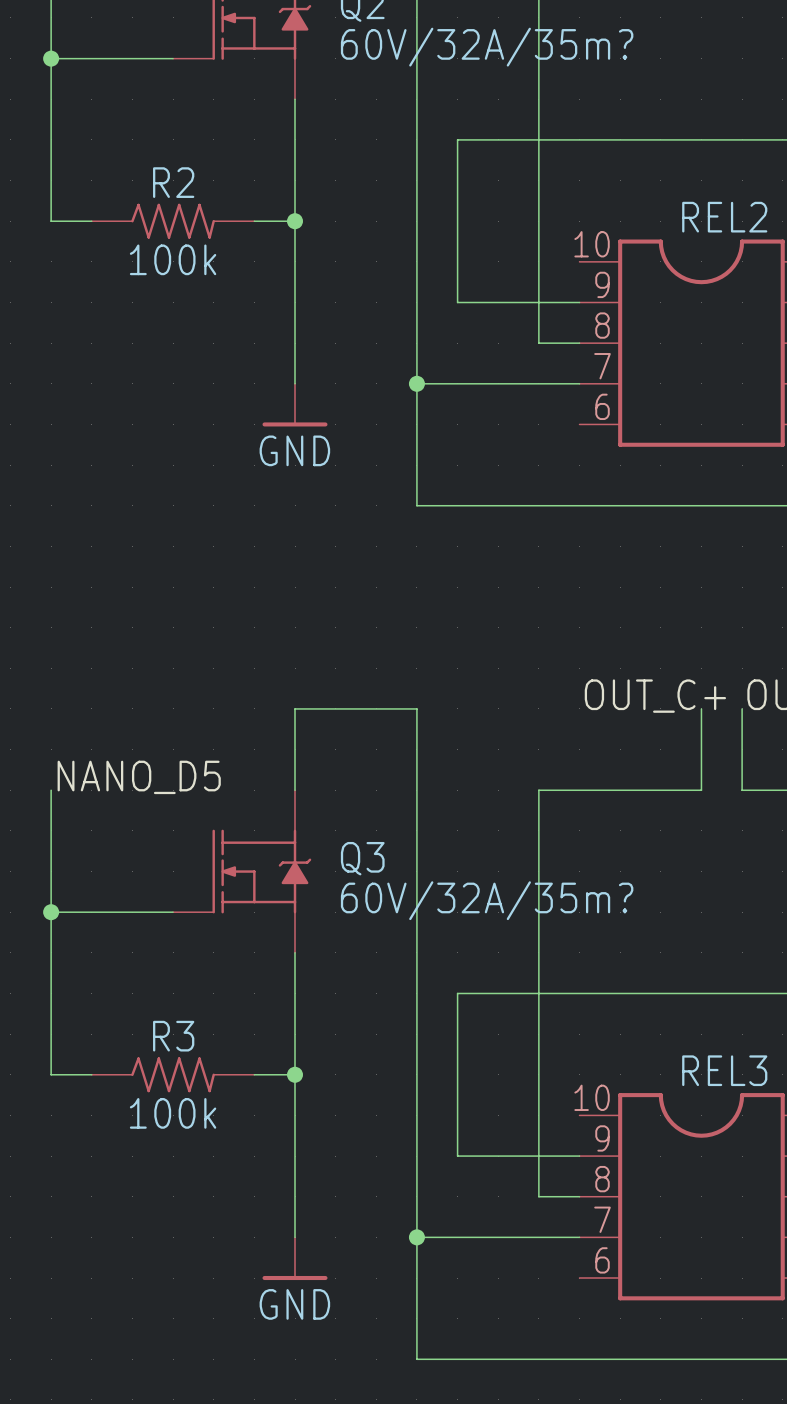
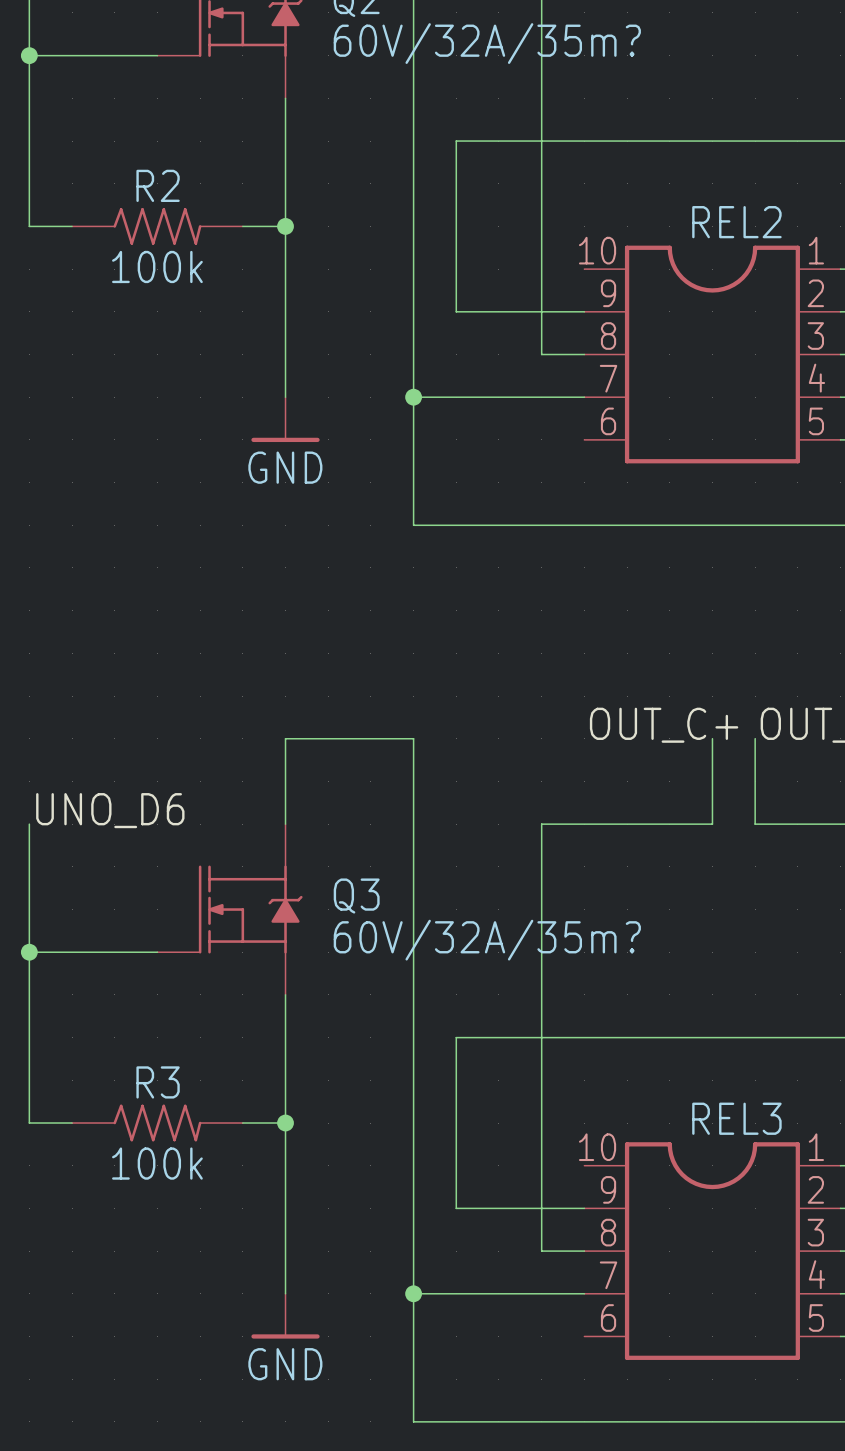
label: NANO_D5 (139, 777) -> UNO_D6 (110, 810)

